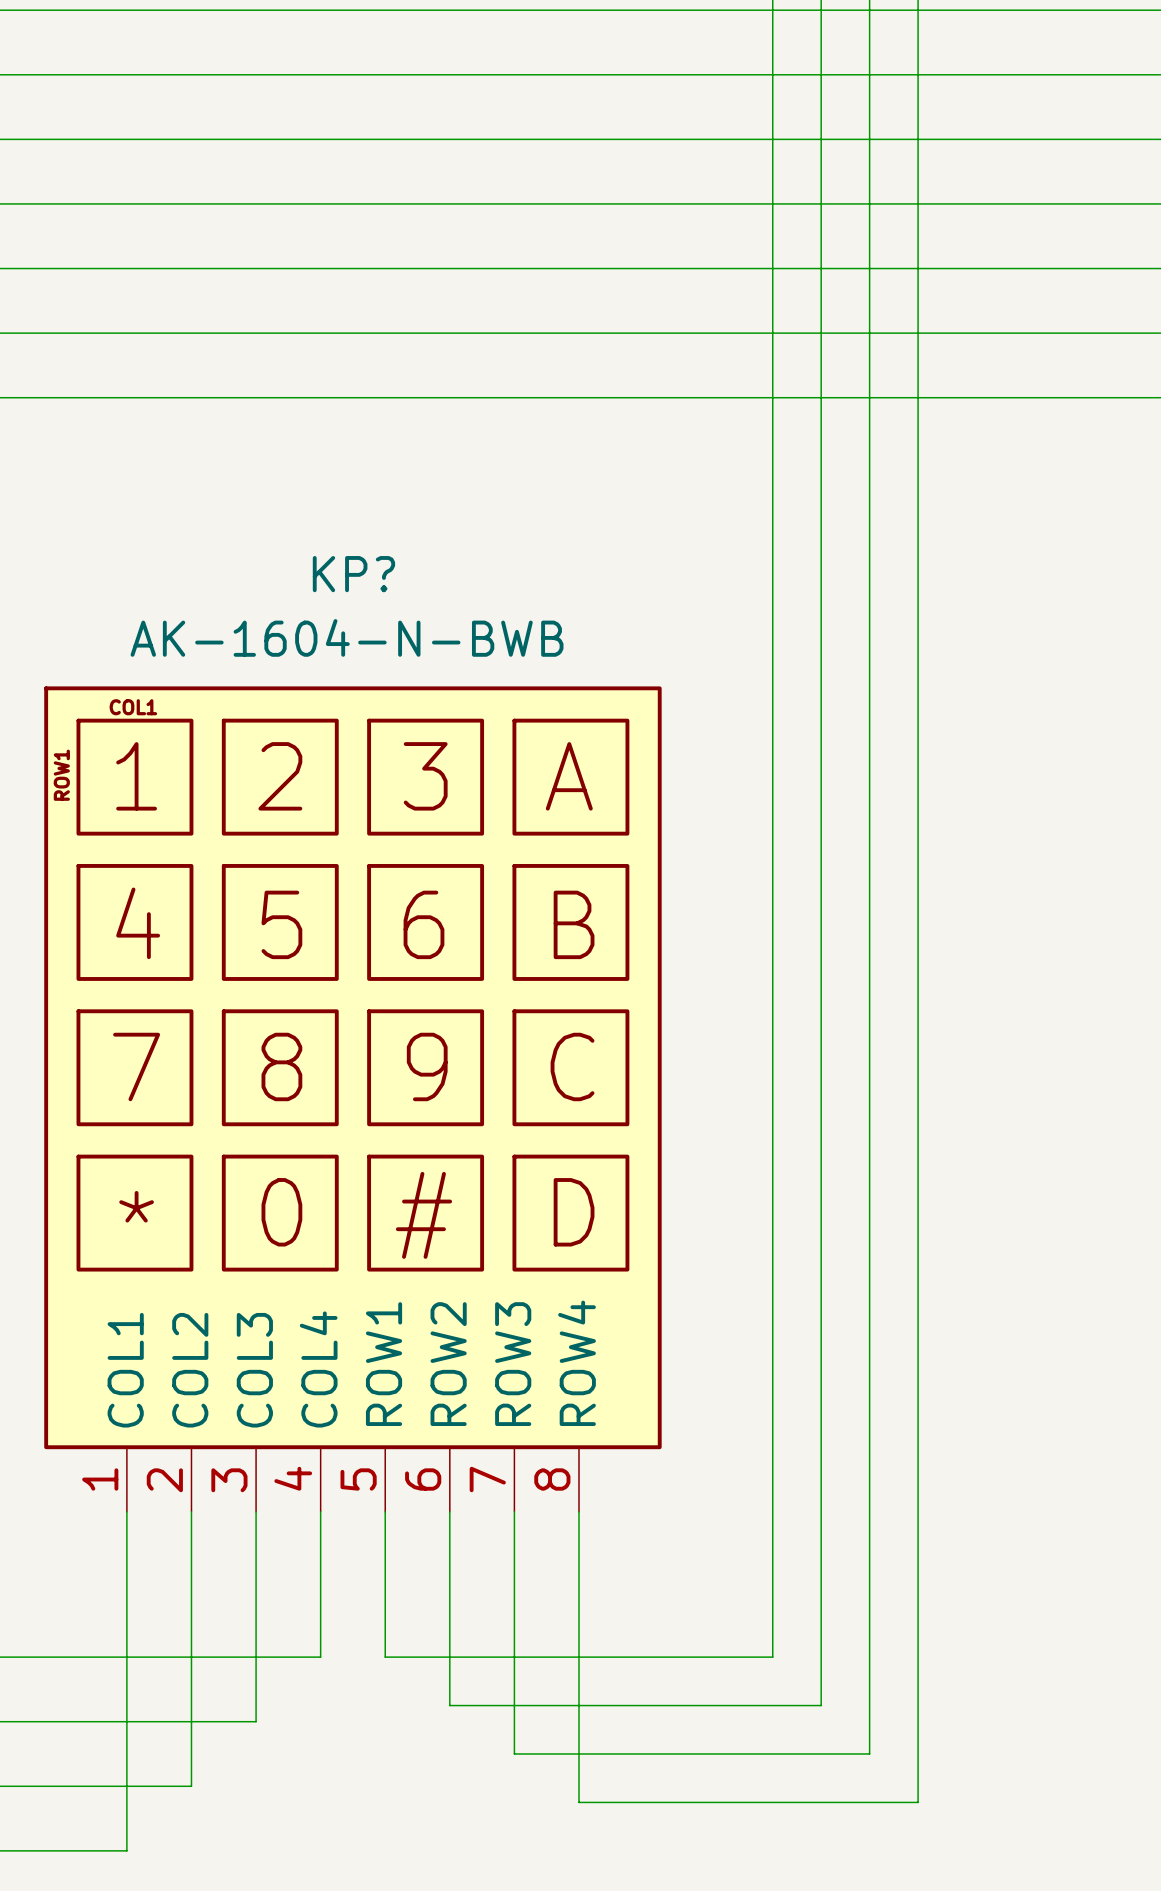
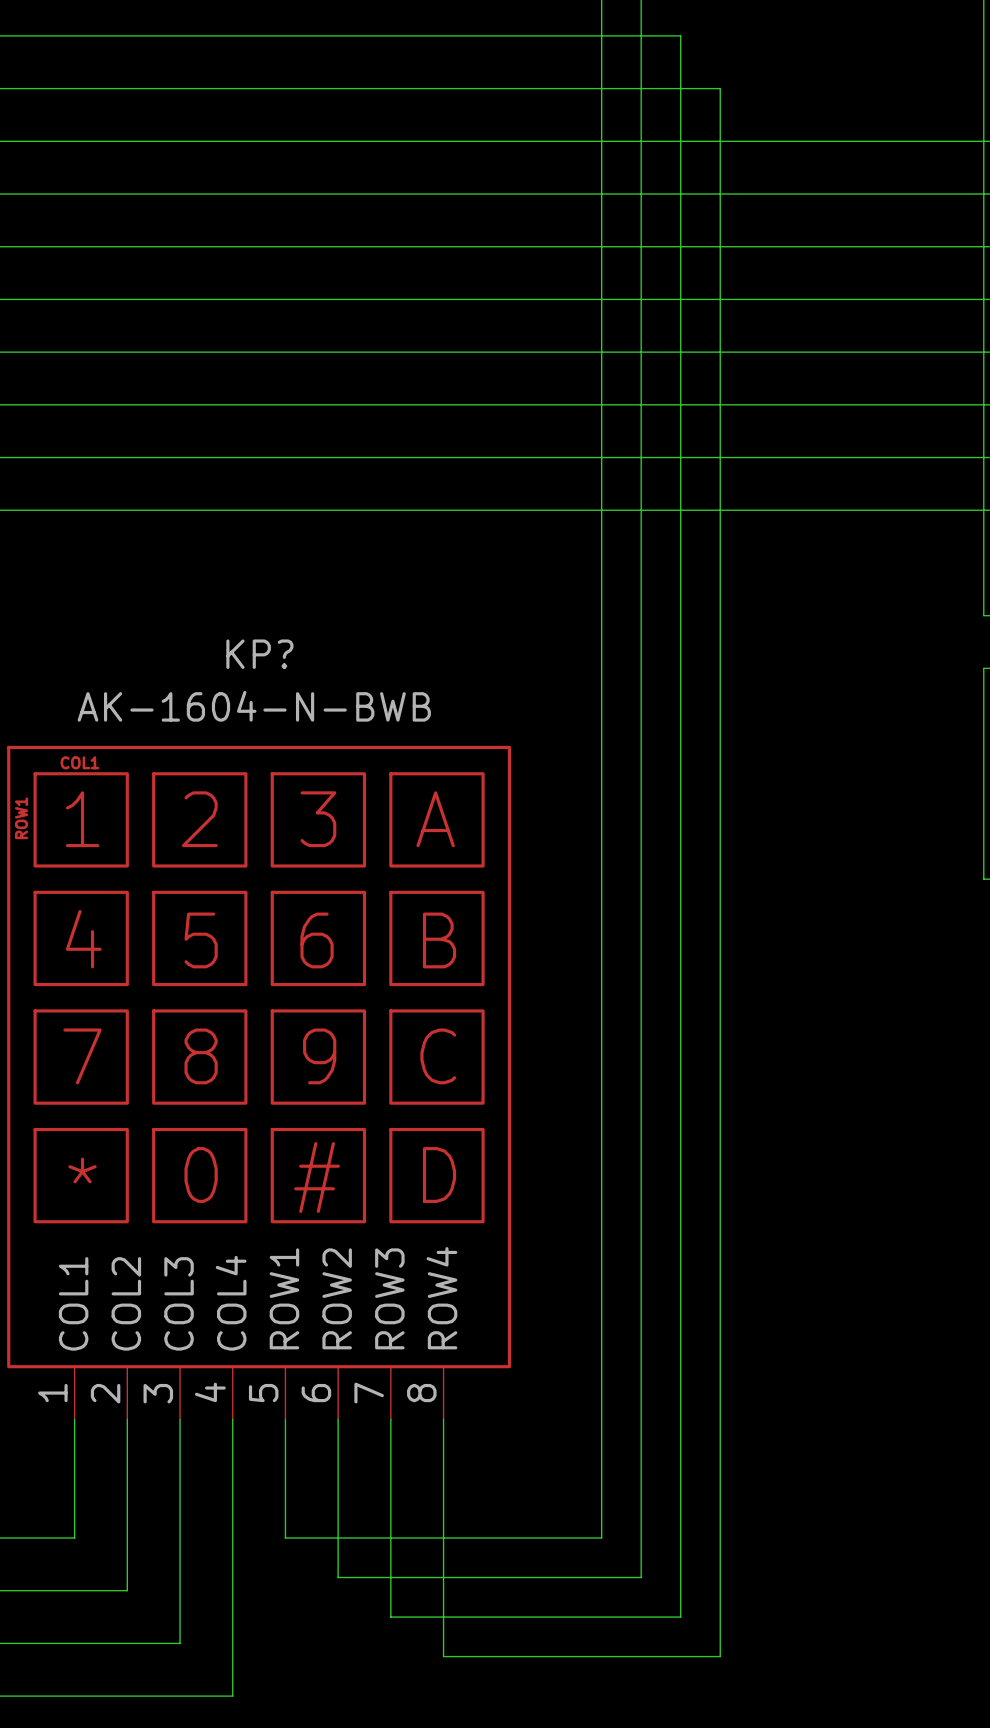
wire: (320, 1657) (126, 1657) (126, 1850) -> (232, 1537) (232, 1696) (74, 1696)
wire: (256, 1721) (191, 1721) (191, 1786) -> (180, 1590) (180, 1643) (127, 1643)

